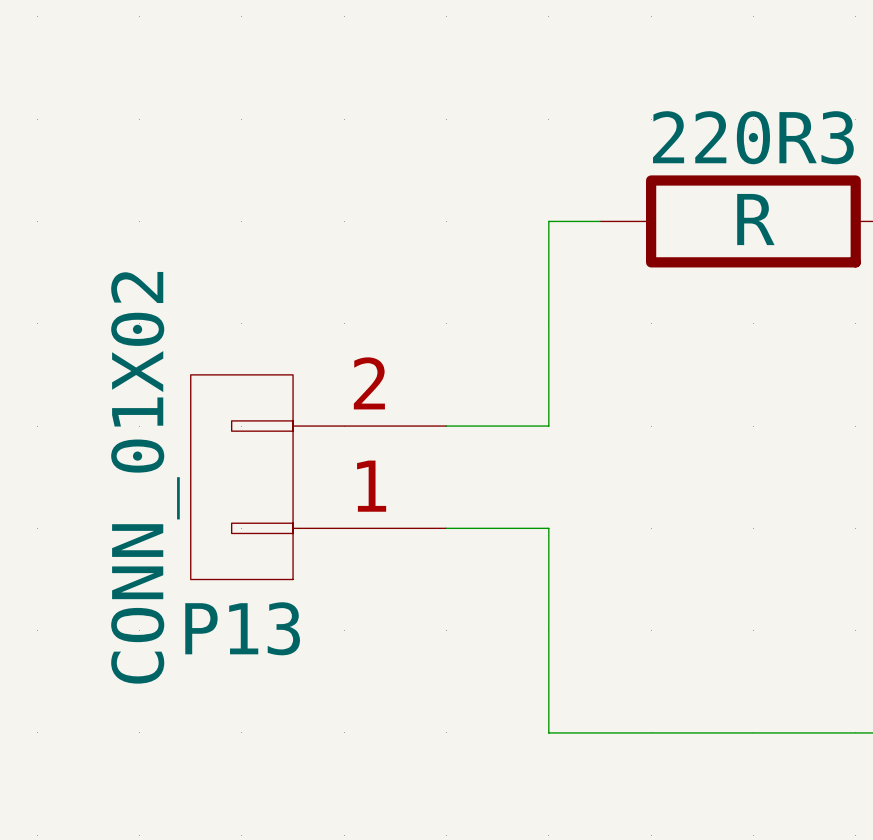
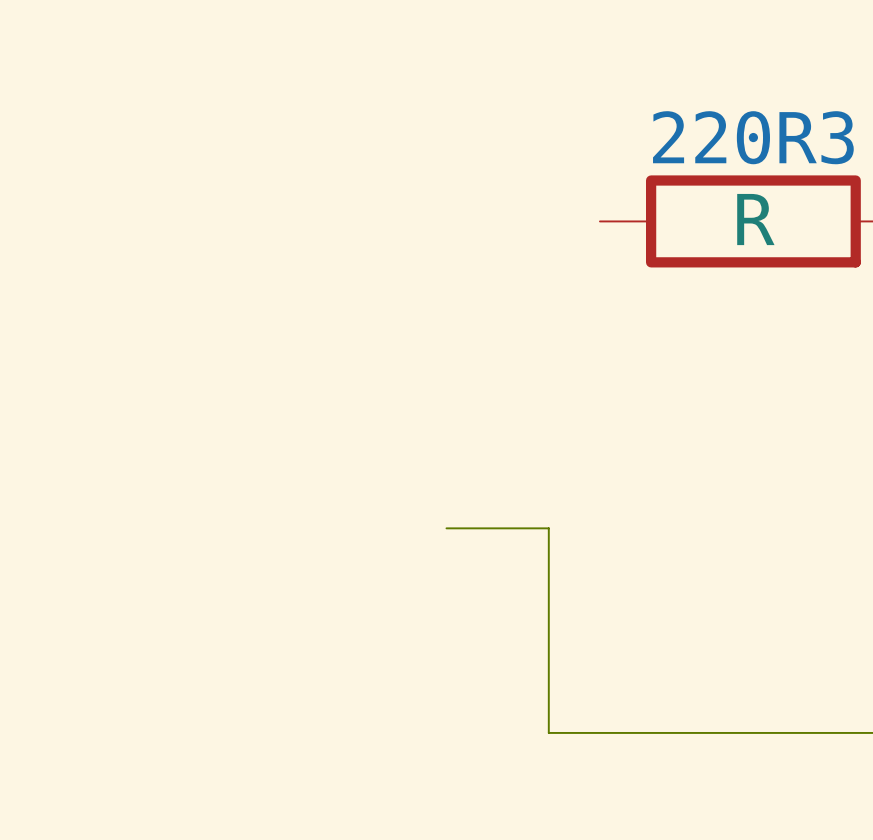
wire: (599, 221) (548, 221) (548, 426) (446, 426) -> none
P13: CONN_01X02 (318, 477) -> none

